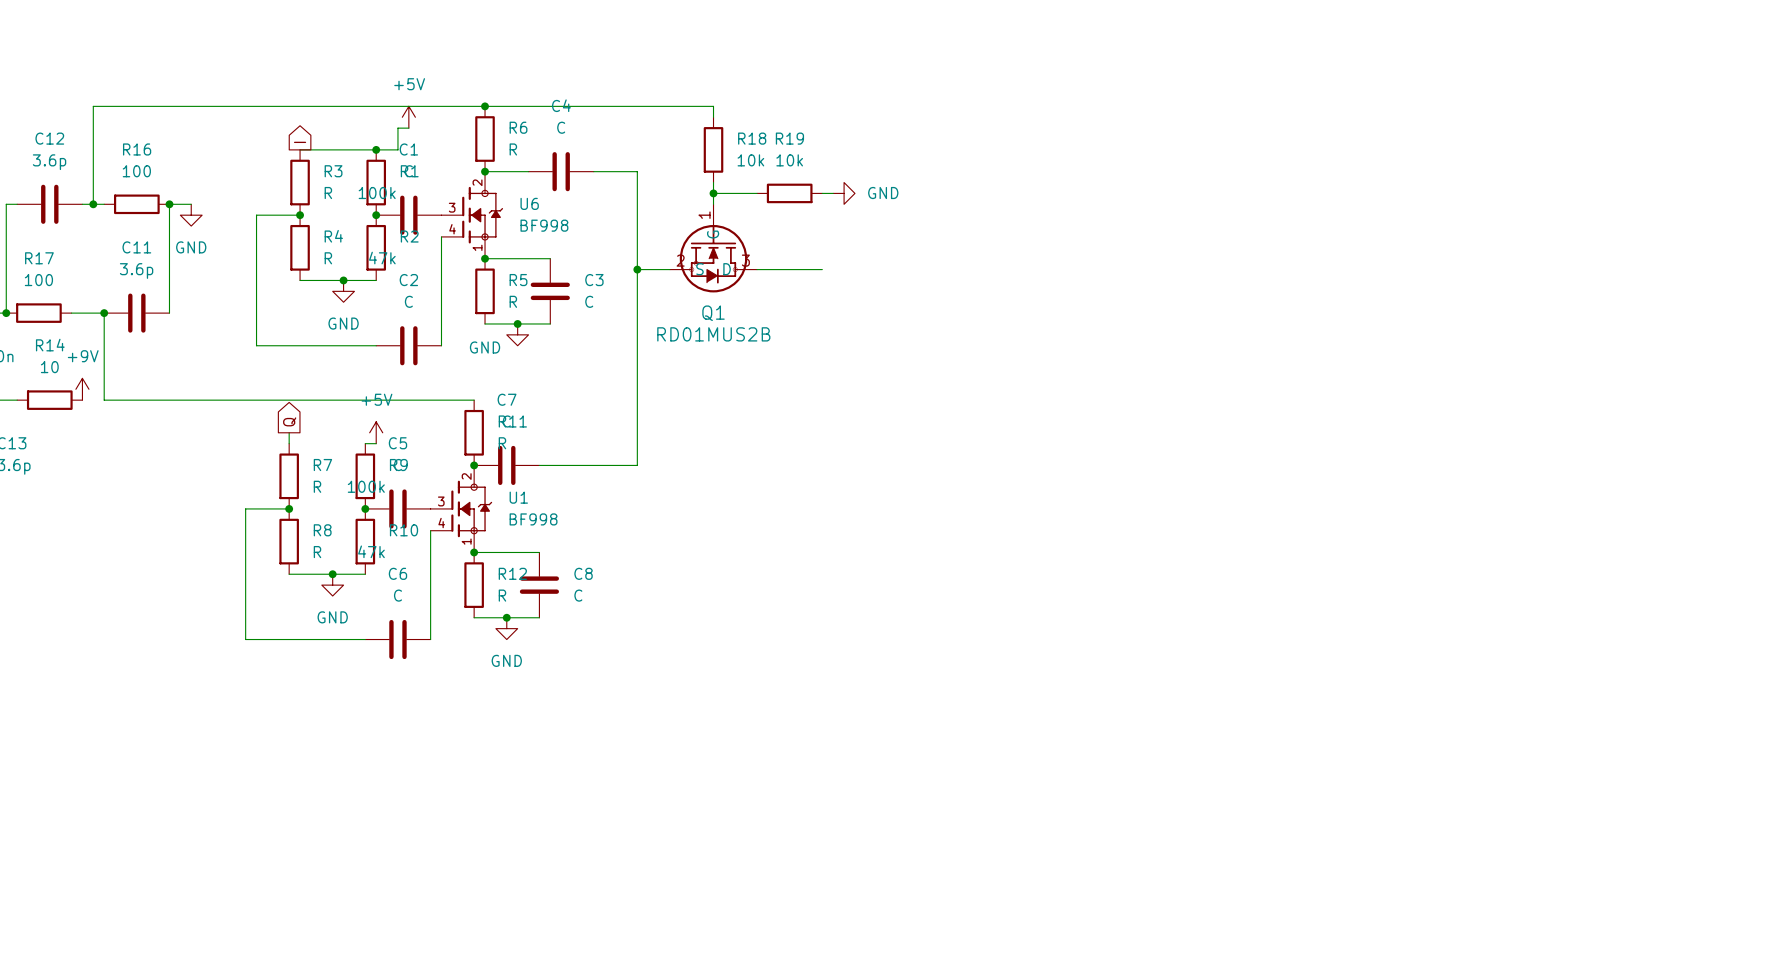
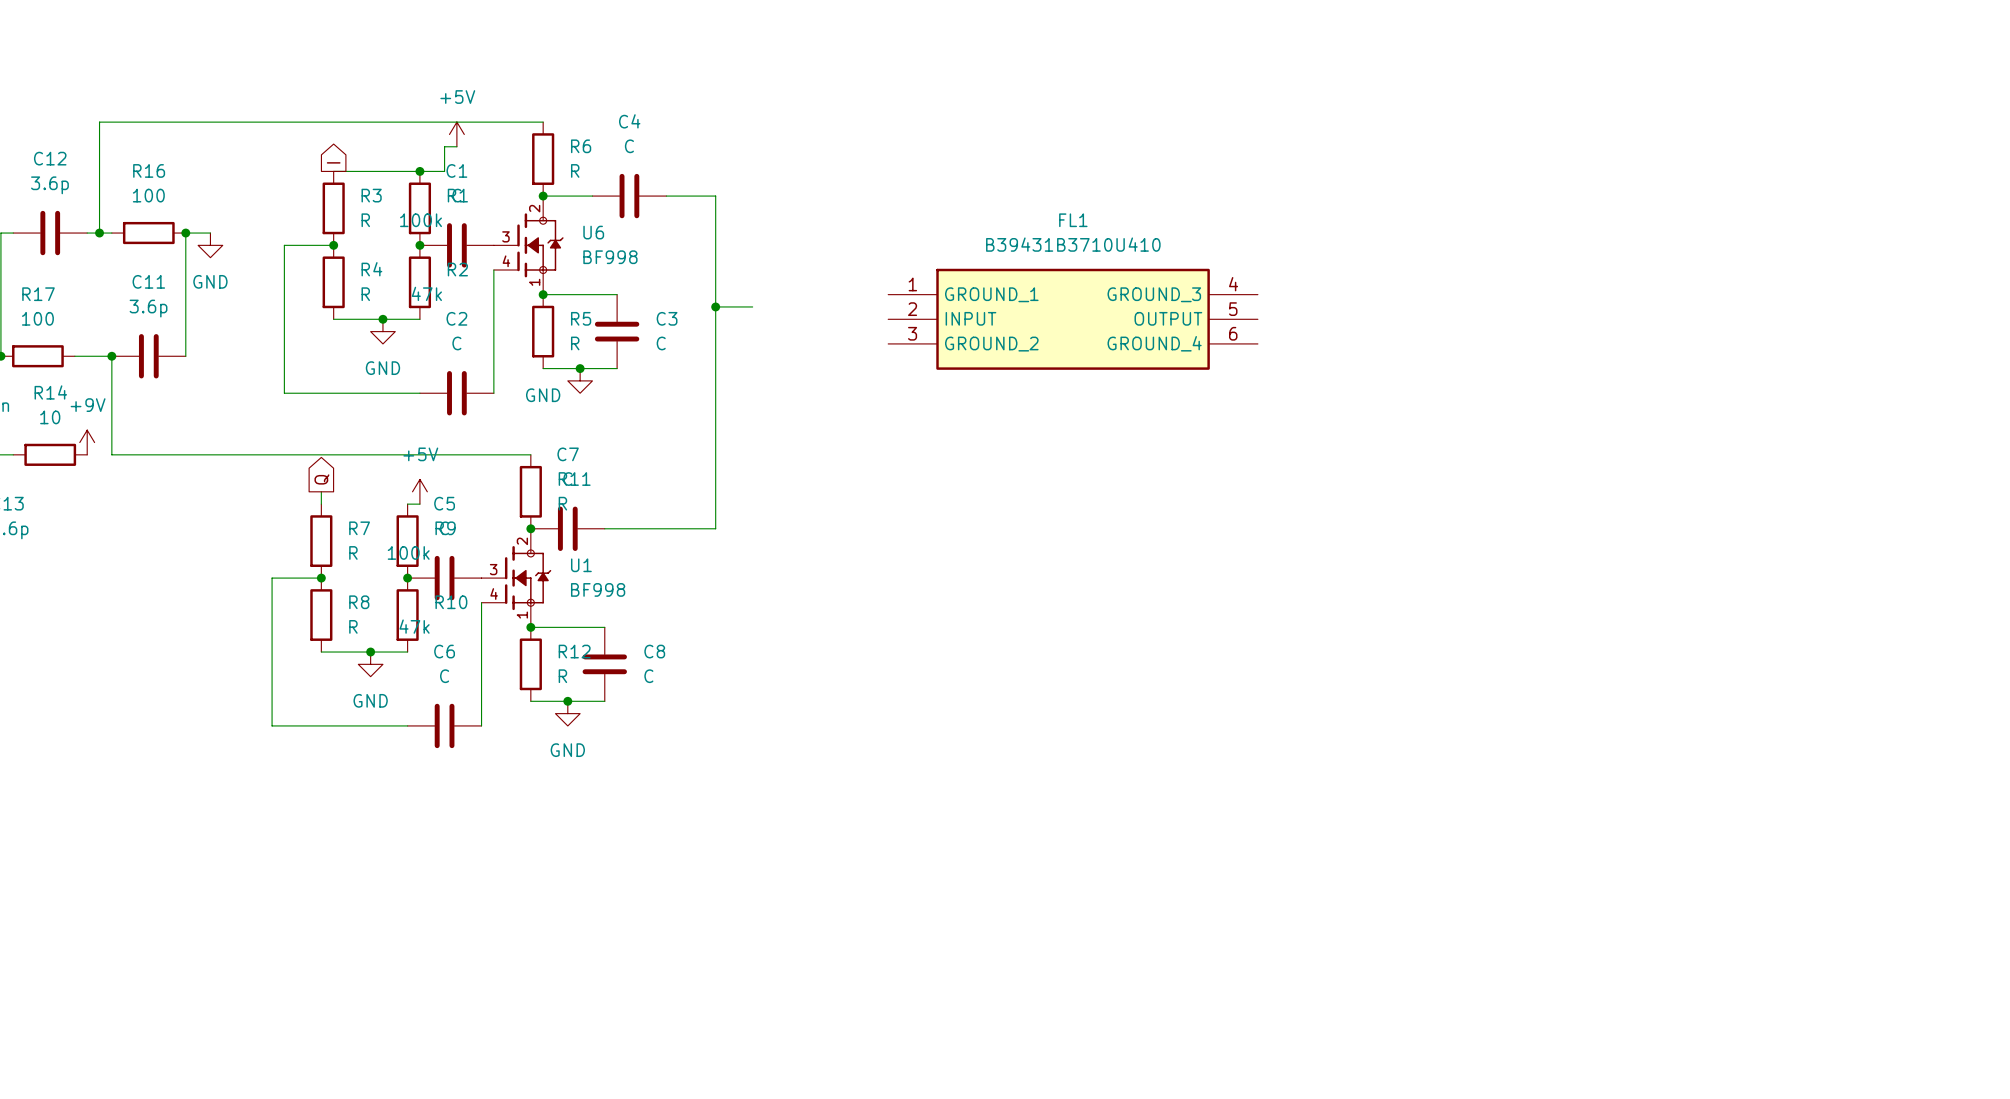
wire: (485, 106) (713, 106) (713, 117) -> none
junction: (485, 106) -> none
R18: 10k (713, 149) -> none
wire: (713, 182) (713, 204) -> none
wire: (713, 193) (757, 193) -> none
junction: (713, 193) -> none
R19: 10k (789, 193) -> none
wire: (822, 193) (833, 193) -> none
power symbol: GND (844, 193) -> none
Q1: RD01MUS2B (713, 248) -> none
wire: (757, 269) (822, 269) -> none
FL1: none -> B39431B3710U410 (1073, 319)

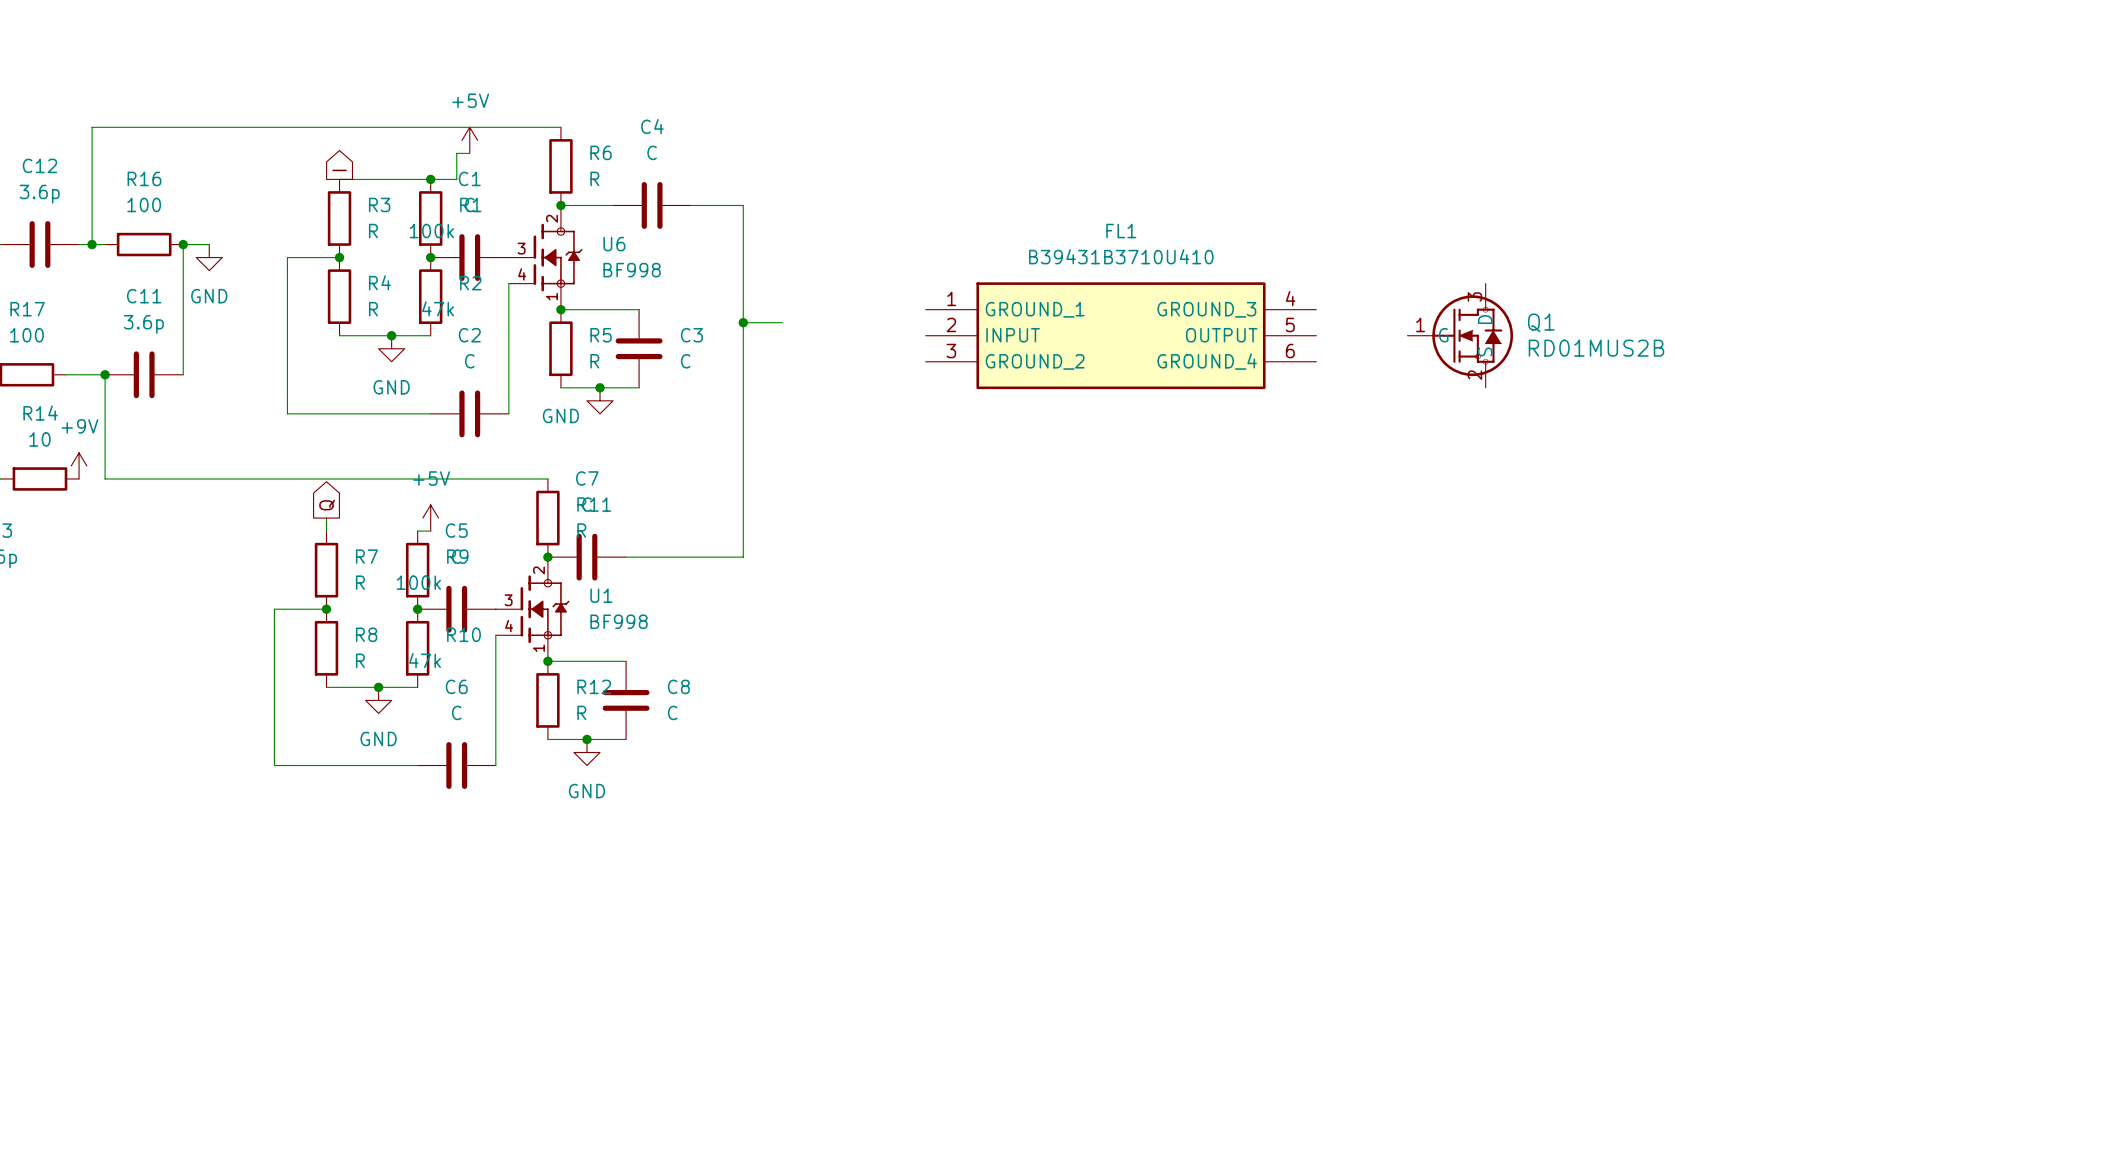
Q1: none -> RD01MUS2B (1460, 335)

